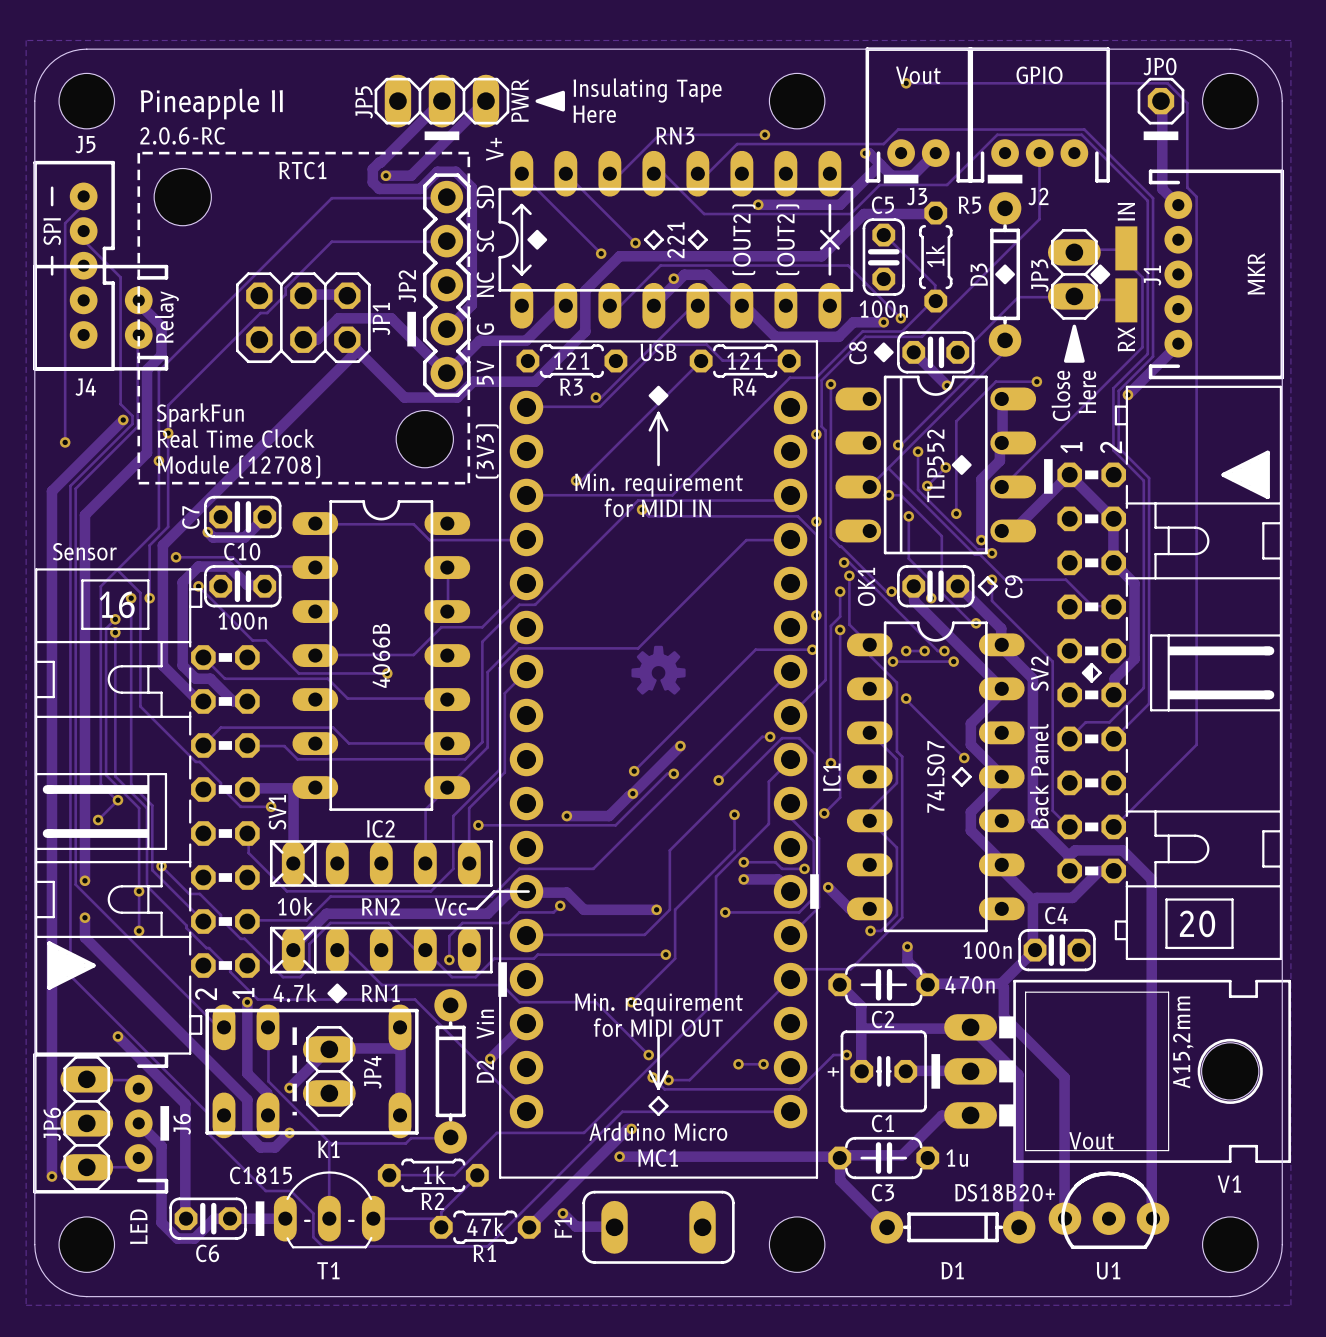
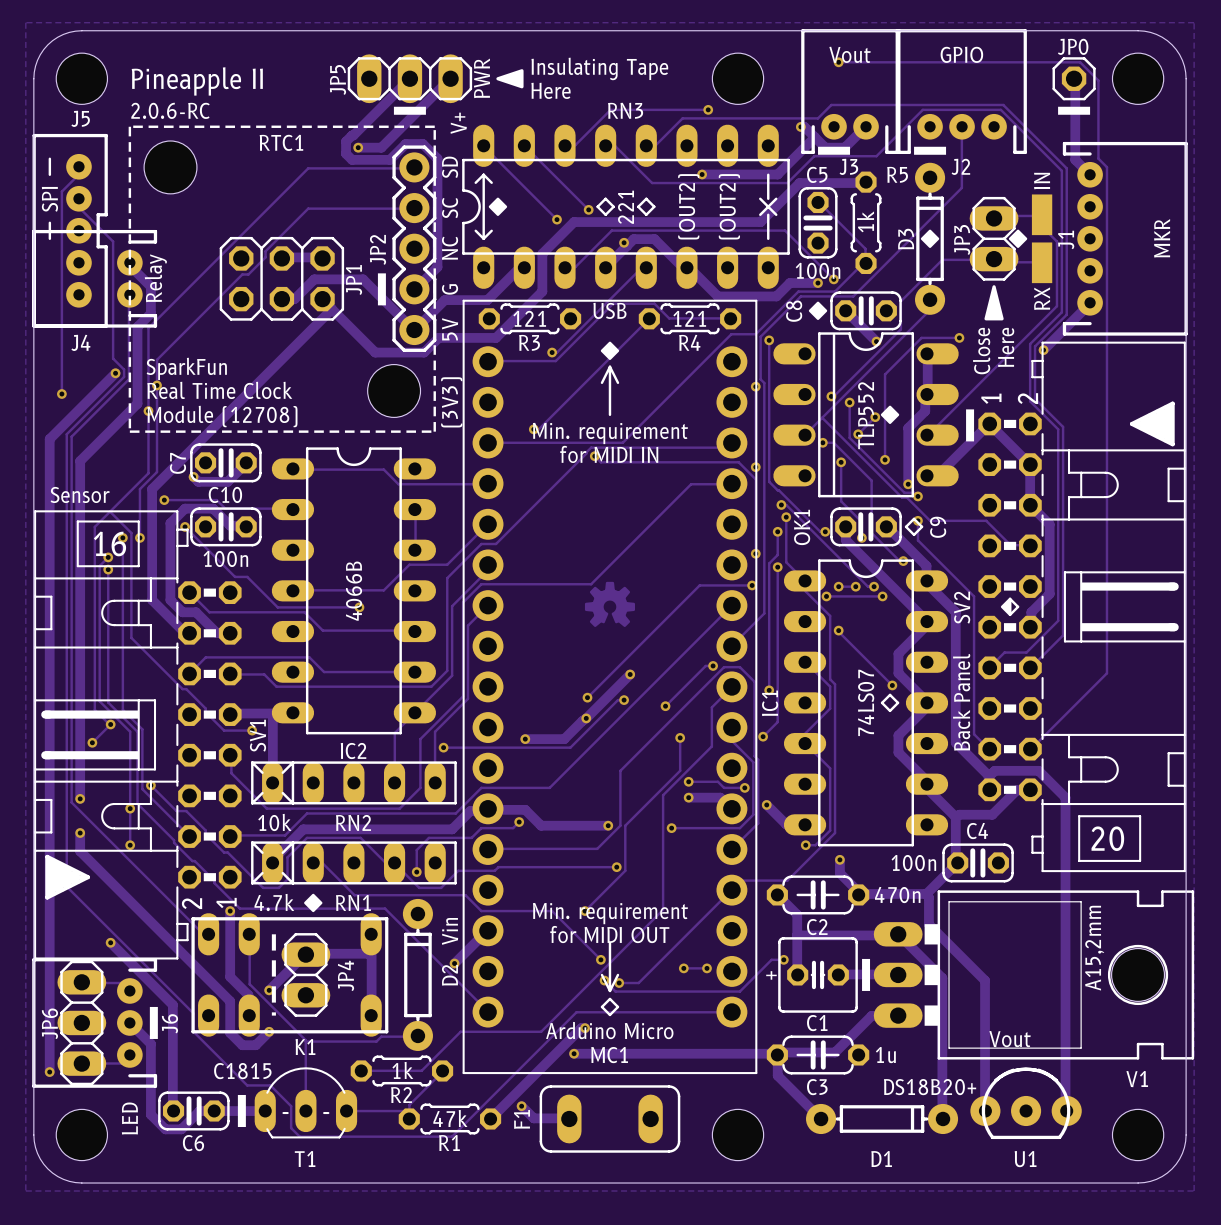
drawing: [810, 874, 819, 909] -> none
line: (528, 891) (493, 891) (476, 908) (467, 908) -> none
text: Vcc (450, 906) -> none
drawing: [498, 962, 507, 997] -> none

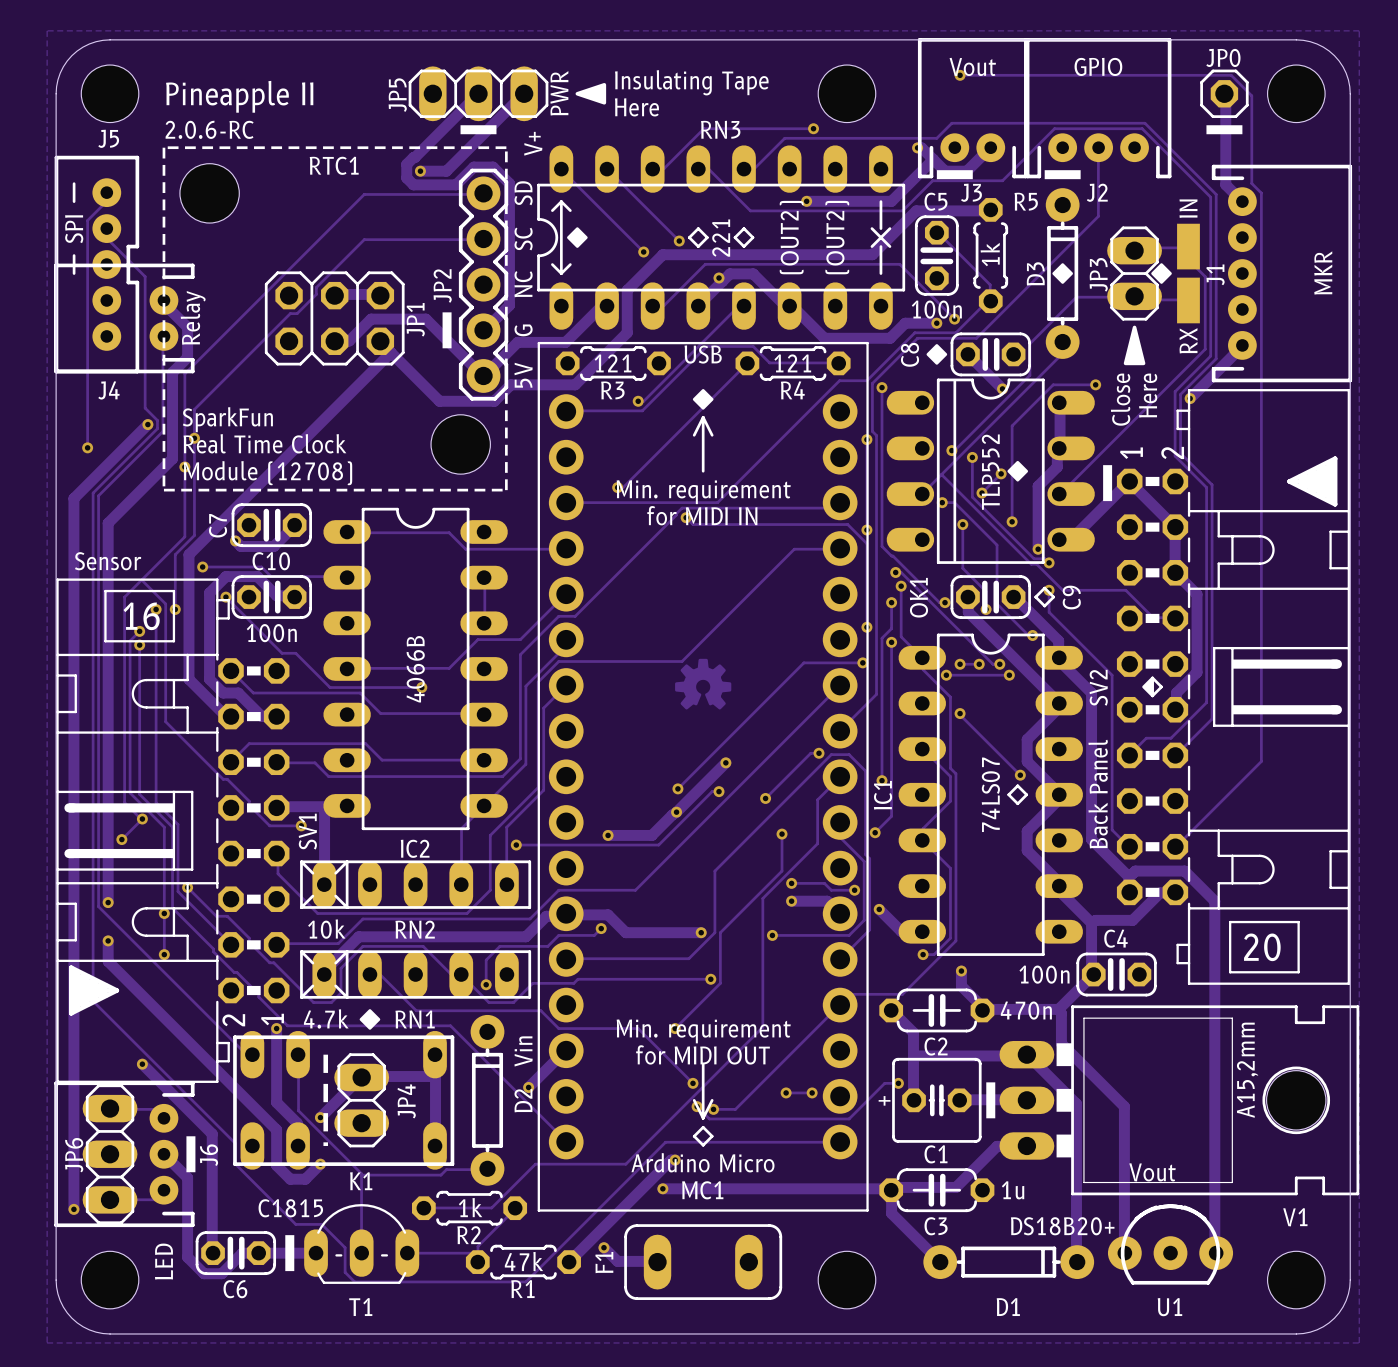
text: (3V3) (451, 402) -> none

